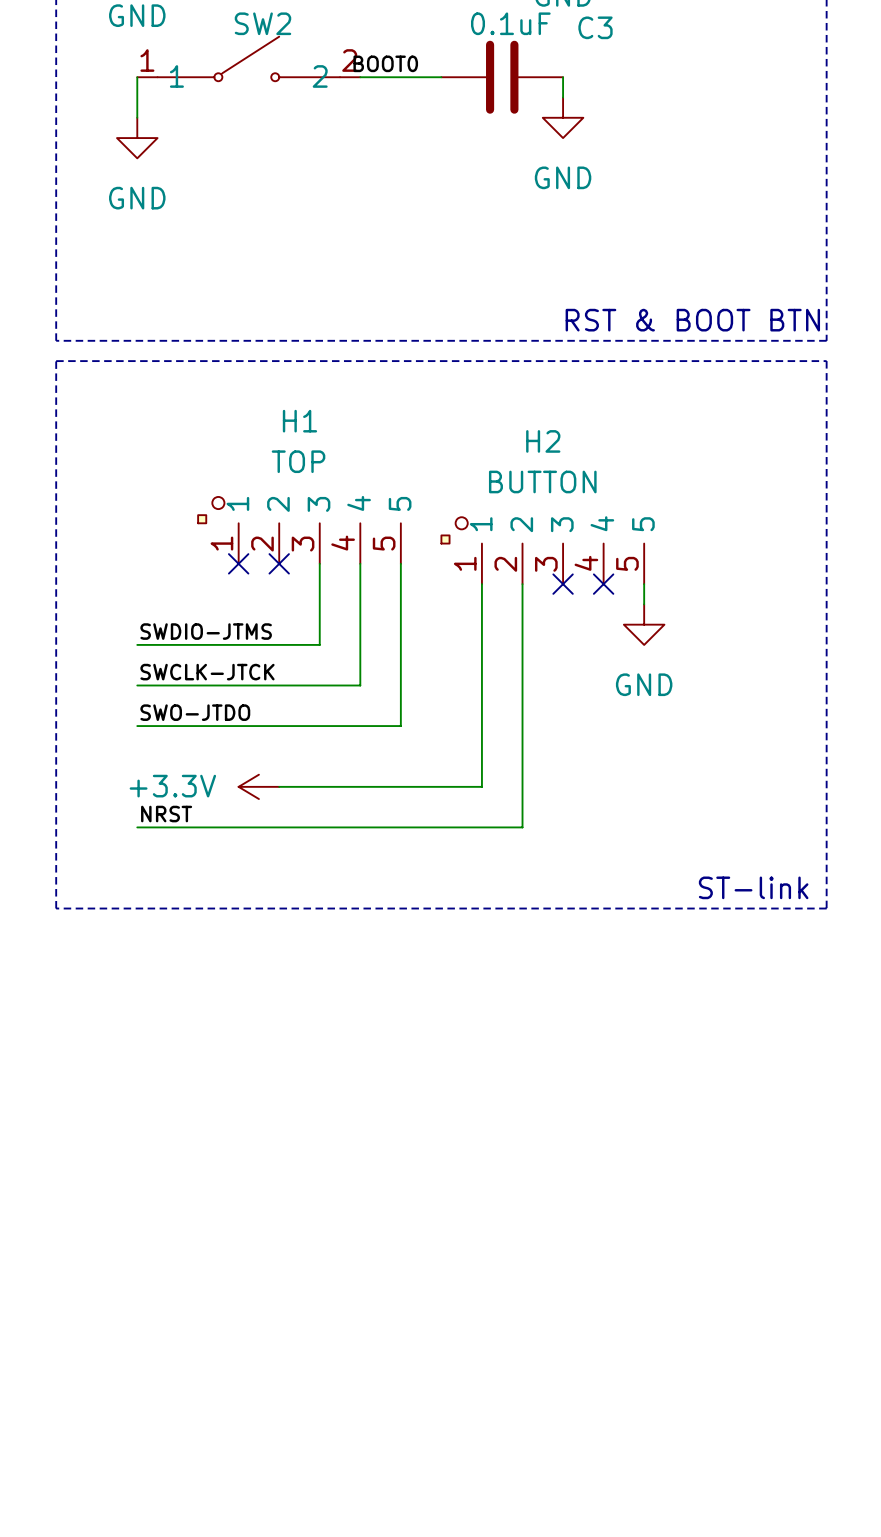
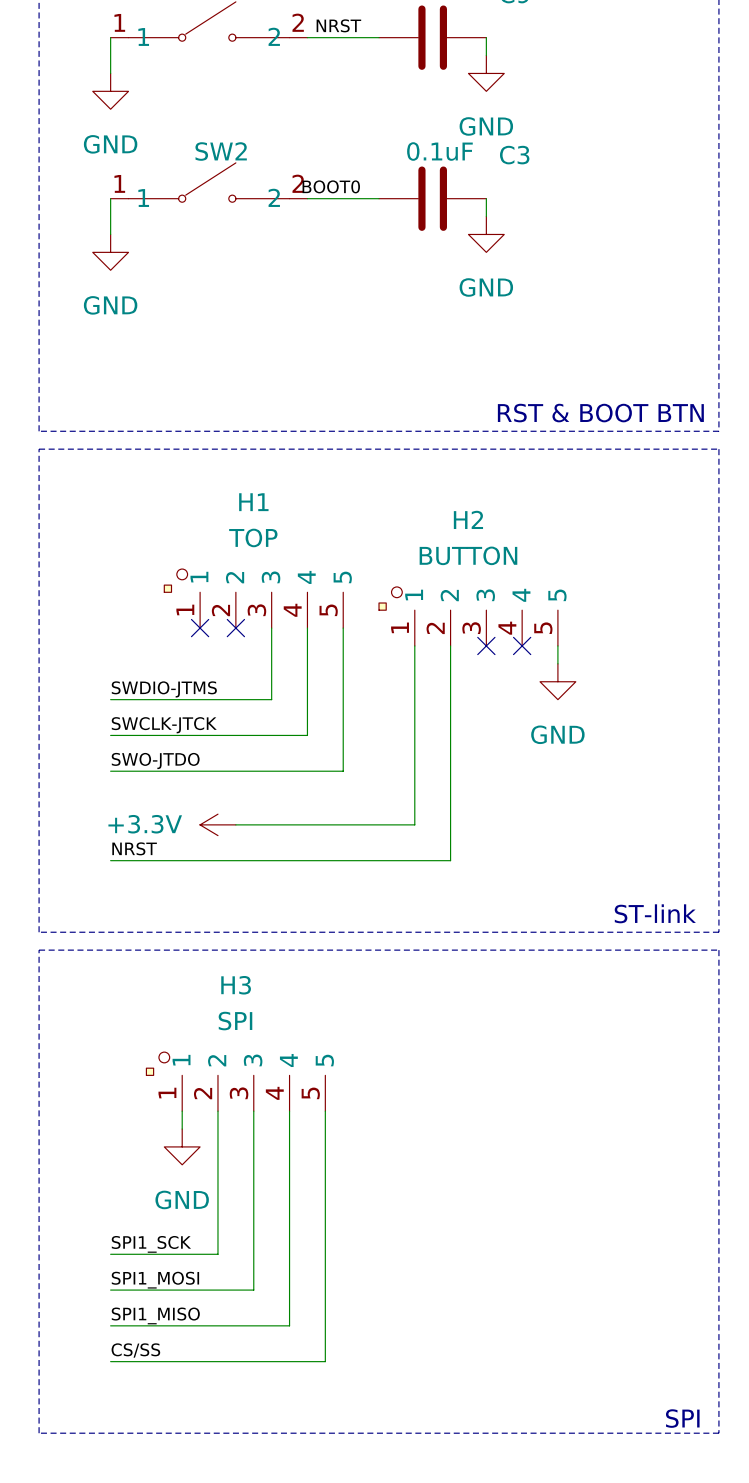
line: none -> (39, 950) (718, 950) (718, 1433) (39, 1433) (39, 950)
H3: none -> SPI (235, 1081)
wire: none -> (182, 1111) (182, 1129)
wire: none -> (217, 1111) (217, 1254) (110, 1254)
wire: none -> (253, 1111) (253, 1290) (110, 1290)
wire: none -> (289, 1111) (289, 1325) (110, 1325)
wire: none -> (325, 1111) (325, 1361) (110, 1361)
power symbol: none -> GND (182, 1146)
label: none -> SPI1_SCK (151, 1244)
label: none -> SPI1_MOSI (155, 1280)
label: none -> SPI1_MISO (155, 1315)
label: none -> CS/SS (135, 1350)
text: none -> SPI (682, 1418)

